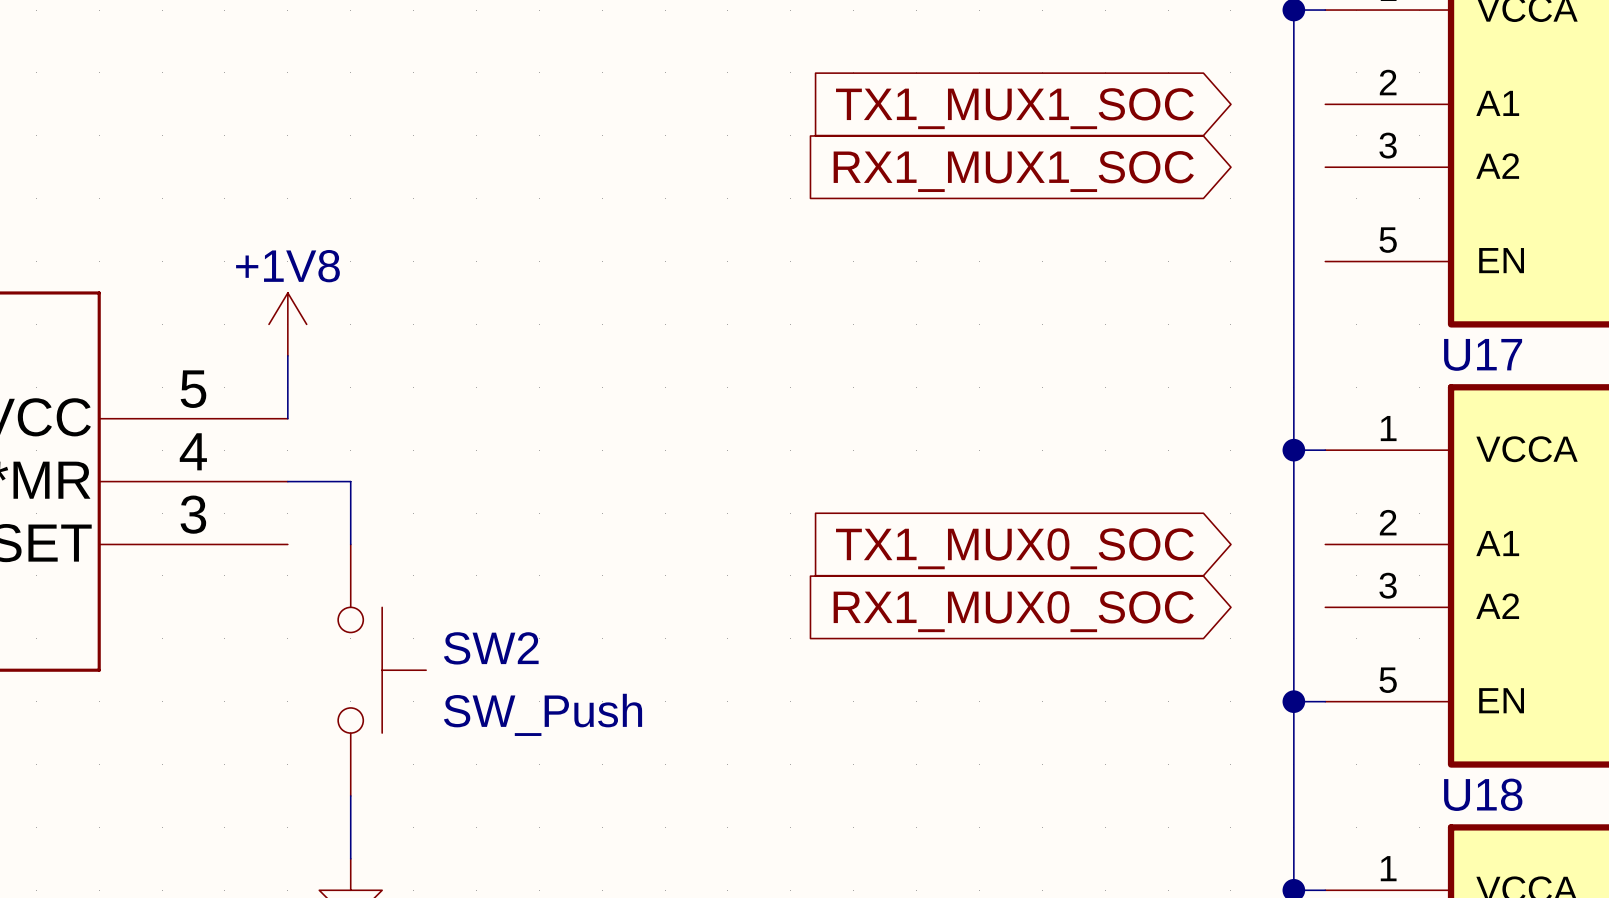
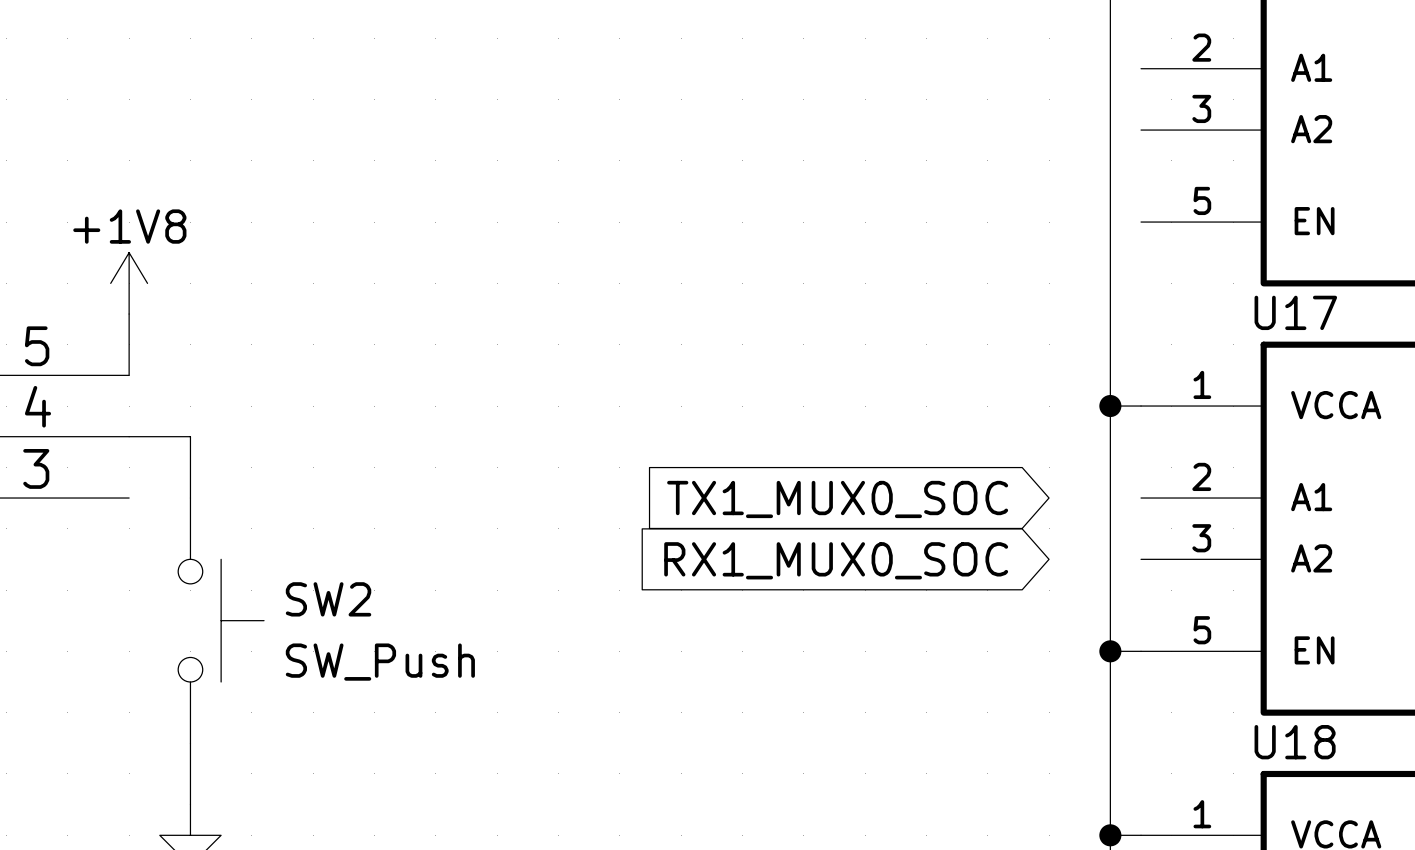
global label: TX1_MUX1_SOC (1014, 108) -> none
global label: RX1_MUX1_SOC (1013, 171) -> none

